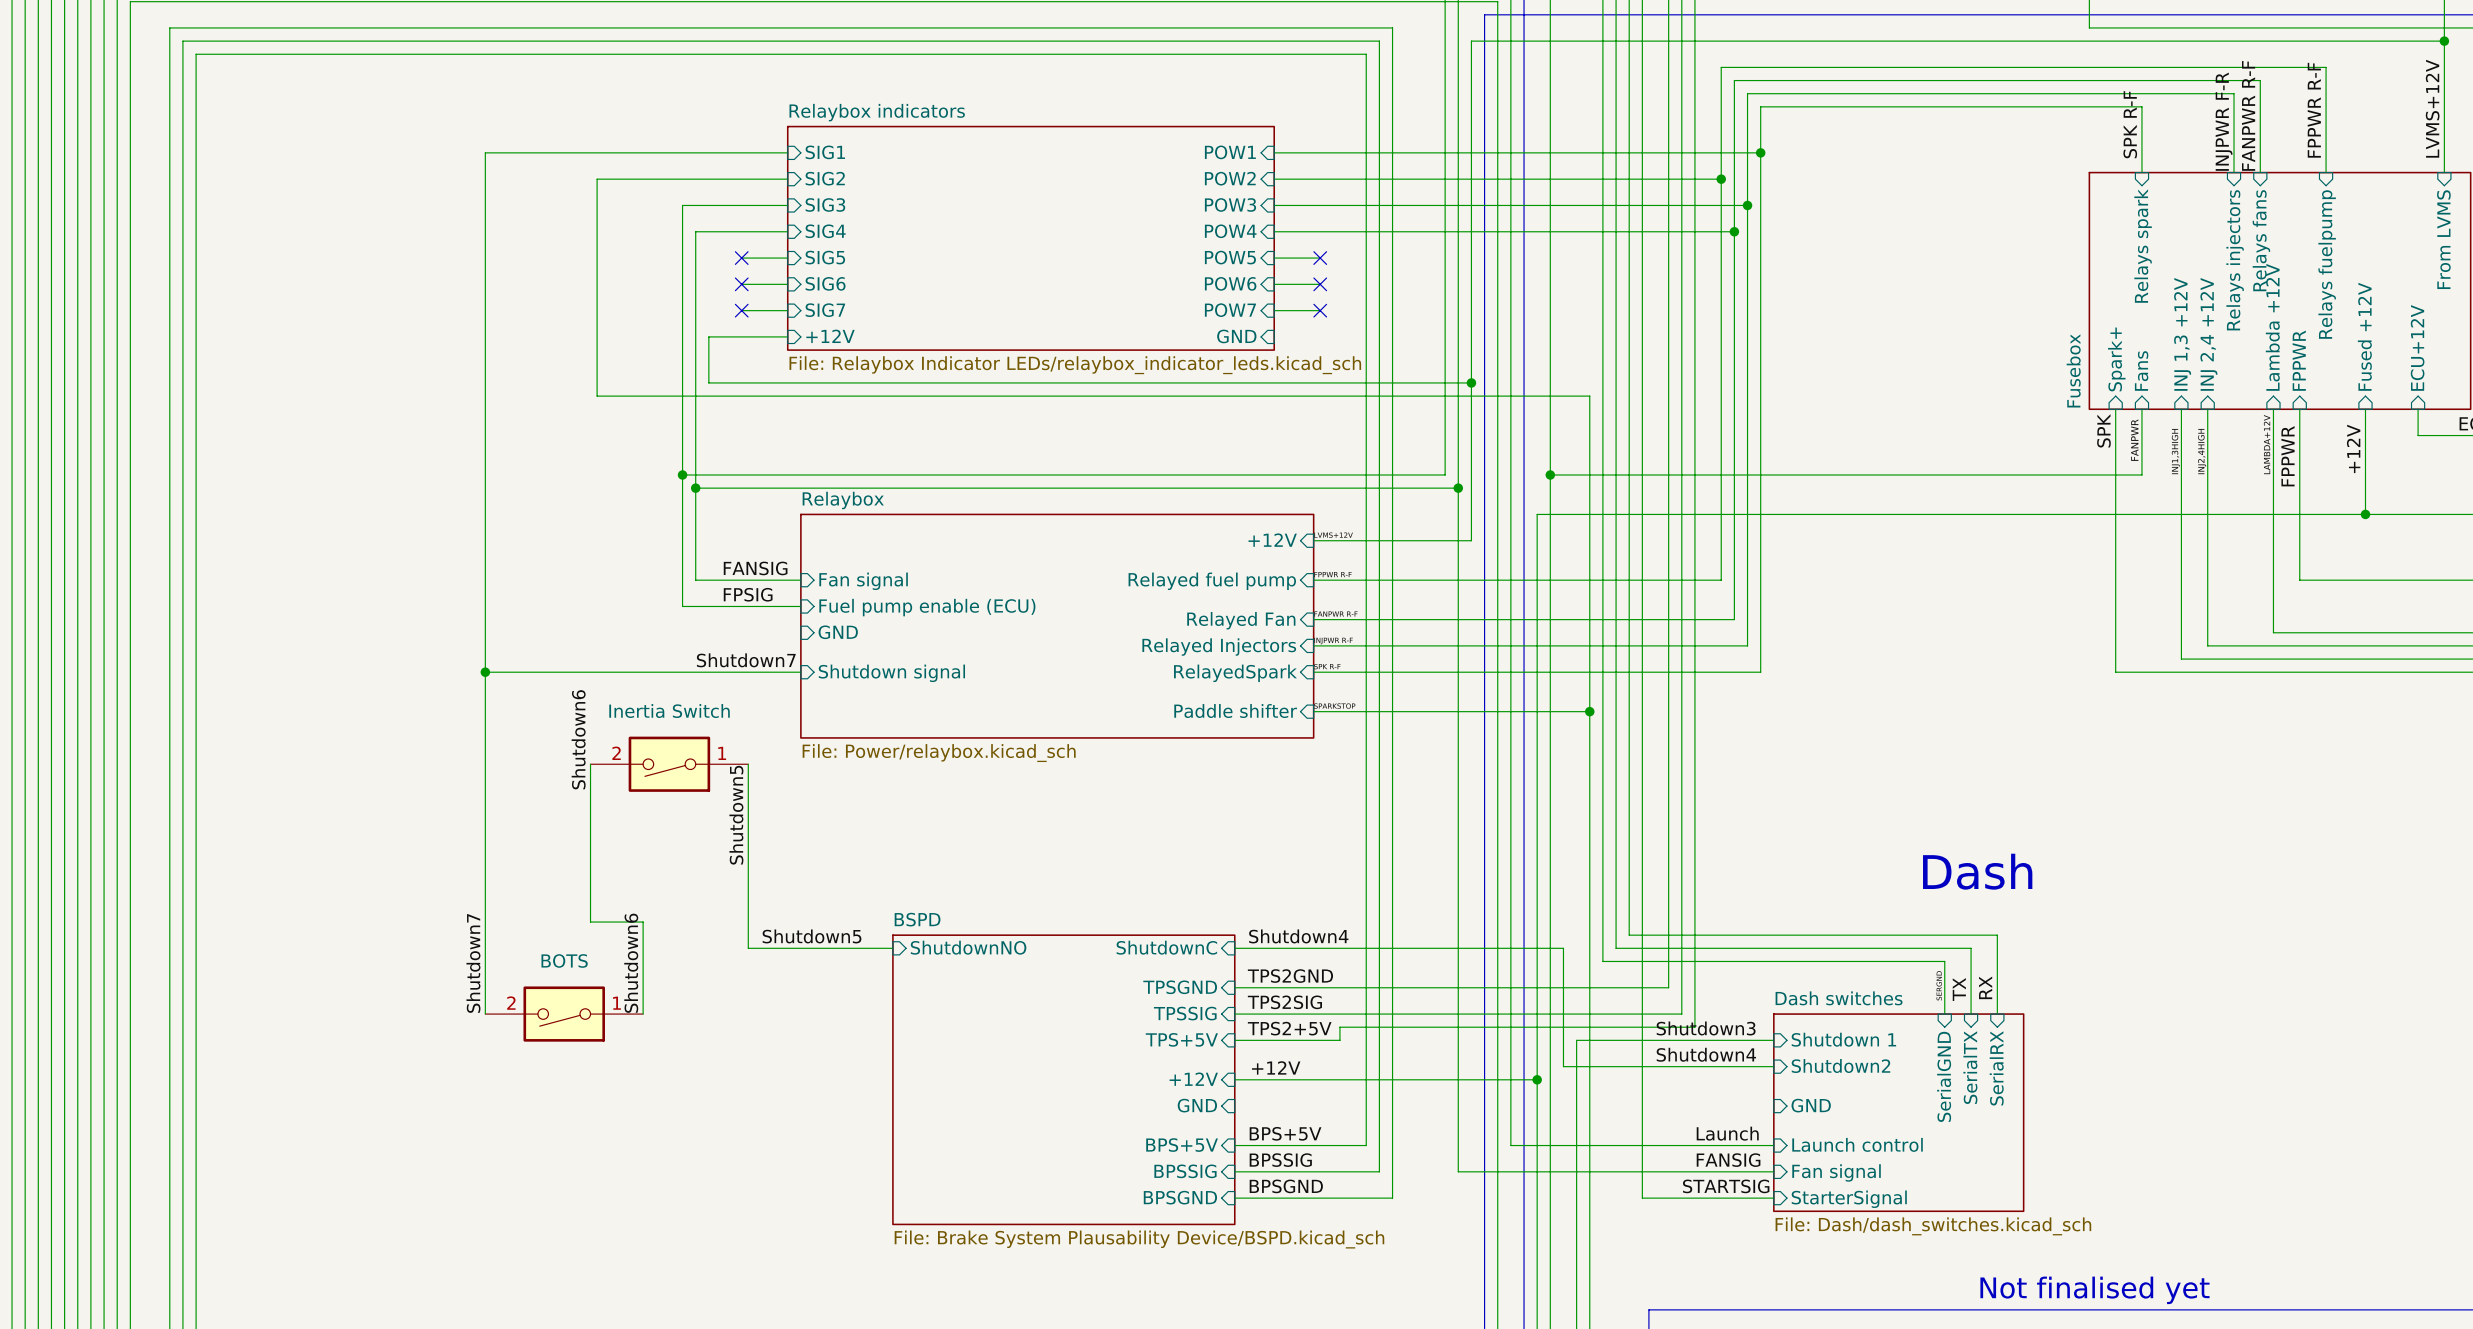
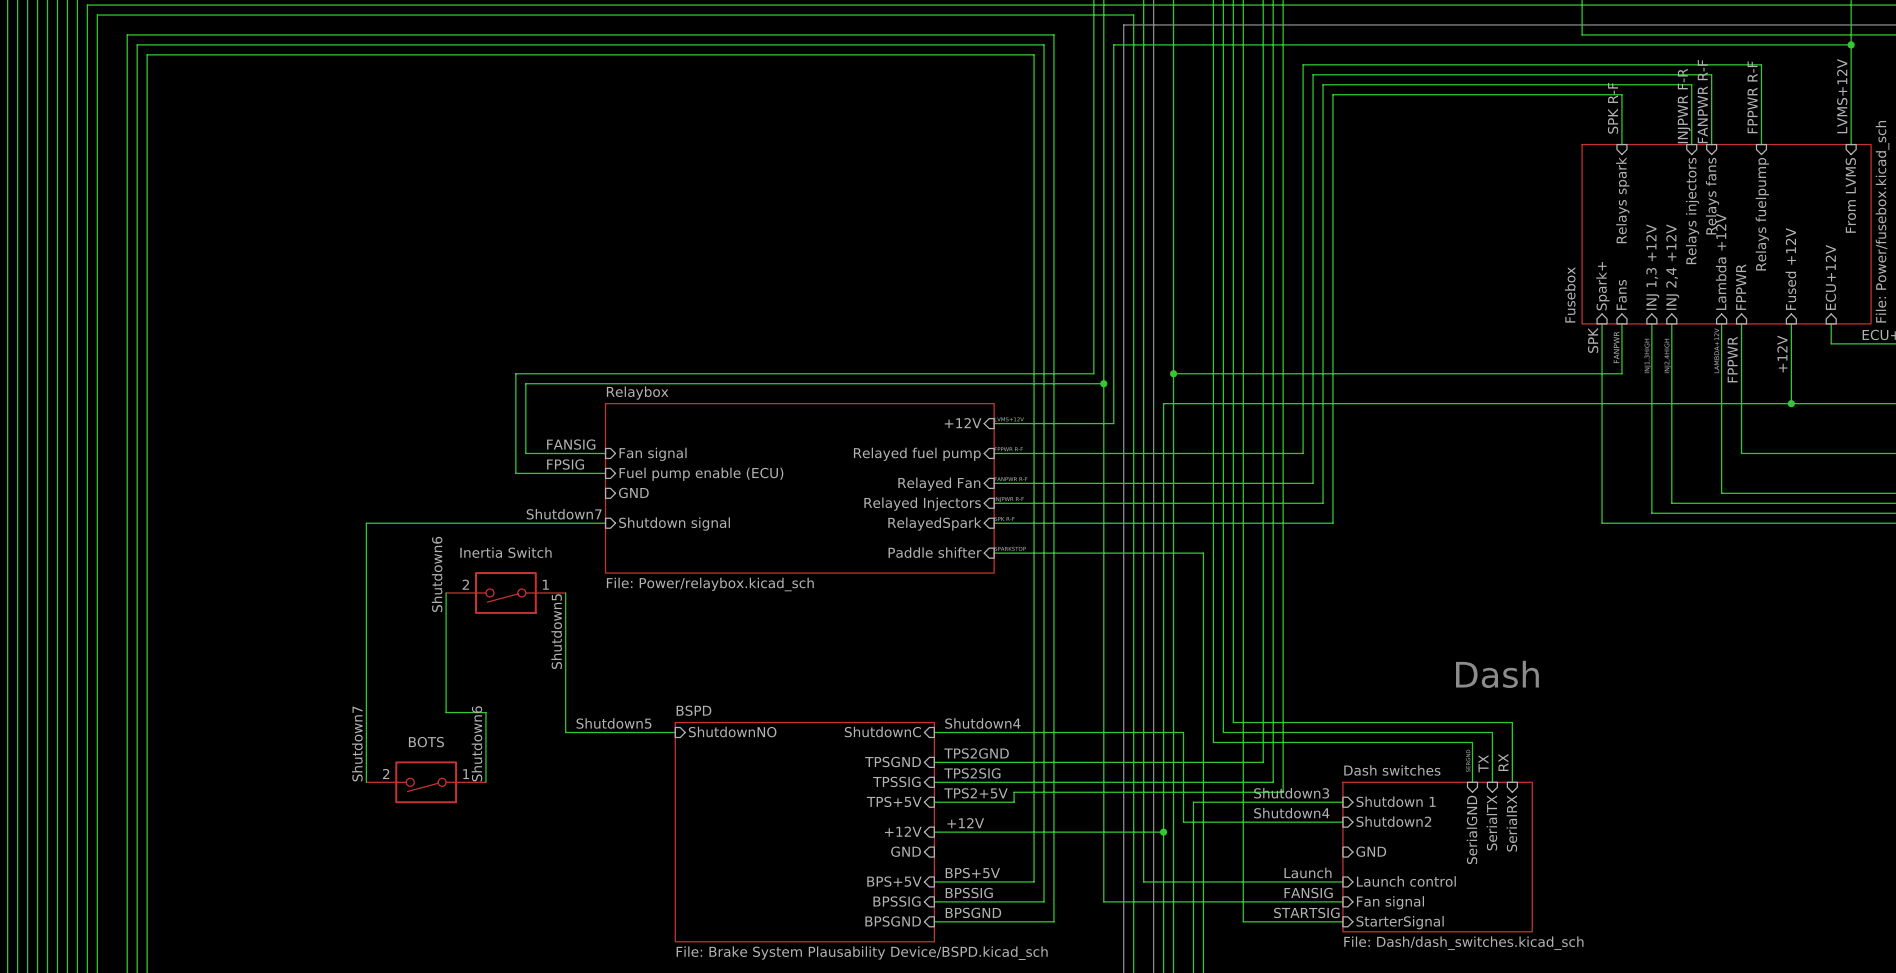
wire: (787, 152) (485, 152) (485, 672) -> none
sheet pin: SIG1 (825, 152) -> none
sheet pin: POW1 (1230, 152) -> none
wire: (1274, 152) (1760, 152) -> none
junction: (1760, 152) -> none
sheet pin: SIG2 (825, 178) -> none
sheet pin: POW2 (1230, 178) -> none
wire: (787, 179) (597, 179) (597, 396) (1589, 396) (1589, 711) -> none
wire: (1274, 179) (1721, 179) -> none
junction: (1721, 179) -> none
sheet pin: SIG3 (825, 204) -> none
sheet pin: POW3 (1230, 204) -> none
wire: (787, 205) (682, 205) (682, 474) -> none
wire: (1274, 205) (1747, 205) -> none
junction: (1747, 205) -> none
wire: (787, 231) (695, 231) (695, 488) -> none
sheet pin: SIG4 (825, 231) -> none
sheet pin: POW4 (1230, 231) -> none
wire: (1274, 231) (1734, 231) -> none
junction: (1734, 231) -> none
sheet Relaybox indicators: File: Relaybox Indicator LEDs/relaybox_indicator_leds.kicad_sch (1030, 238) -> none
sheet pin: SIG5 (825, 257) -> none
sheet pin: POW5 (1230, 257) -> none
wire: (741, 258) (787, 258) -> none
no-connect mark: (741, 258) -> none
wire: (1274, 258) (1320, 258) -> none
no-connect mark: (1320, 258) -> none
sheet pin: SIG6 (825, 283) -> none
sheet pin: POW6 (1230, 283) -> none
wire: (741, 284) (787, 284) -> none
no-connect mark: (741, 284) -> none
wire: (1274, 284) (1320, 284) -> none
no-connect mark: (1320, 284) -> none
wire: (741, 310) (787, 310) -> none
no-connect mark: (741, 310) -> none
sheet pin: SIG7 (825, 310) -> none
sheet pin: POW7 (1230, 310) -> none
wire: (1274, 310) (1320, 310) -> none
no-connect mark: (1320, 310) -> none
wire: (787, 336) (708, 336) (708, 382) (1471, 382) -> none
sheet pin: +12V (830, 336) -> none
sheet pin: GND (1236, 336) -> none
junction: (1471, 382) -> none
junction: (682, 474) -> none
junction: (695, 488) -> none
junction: (485, 672) -> none
junction: (1589, 711) -> none

